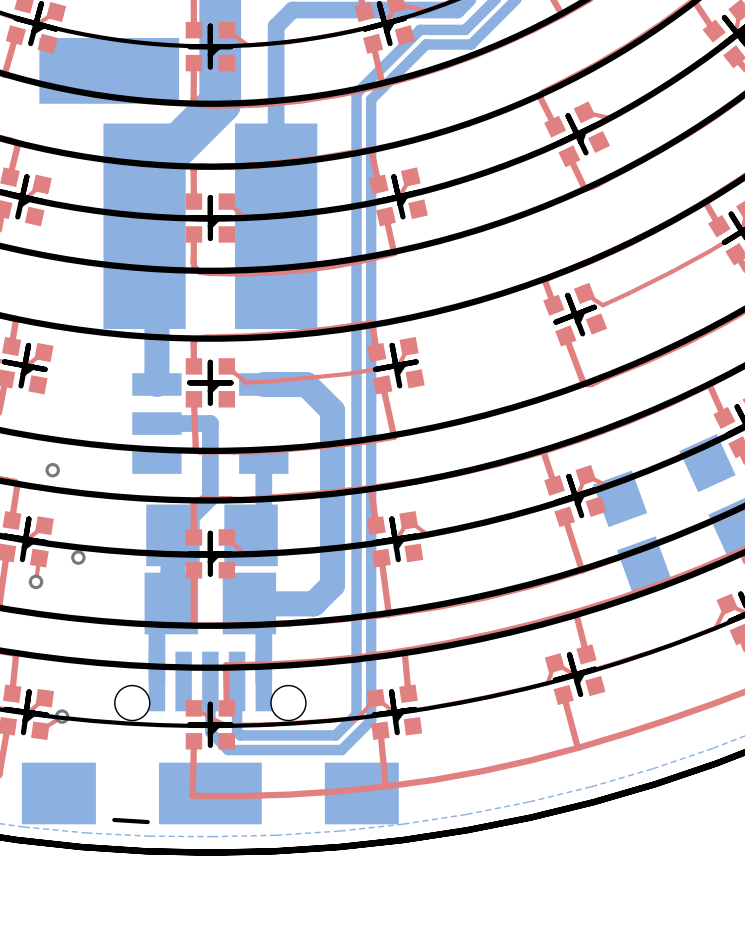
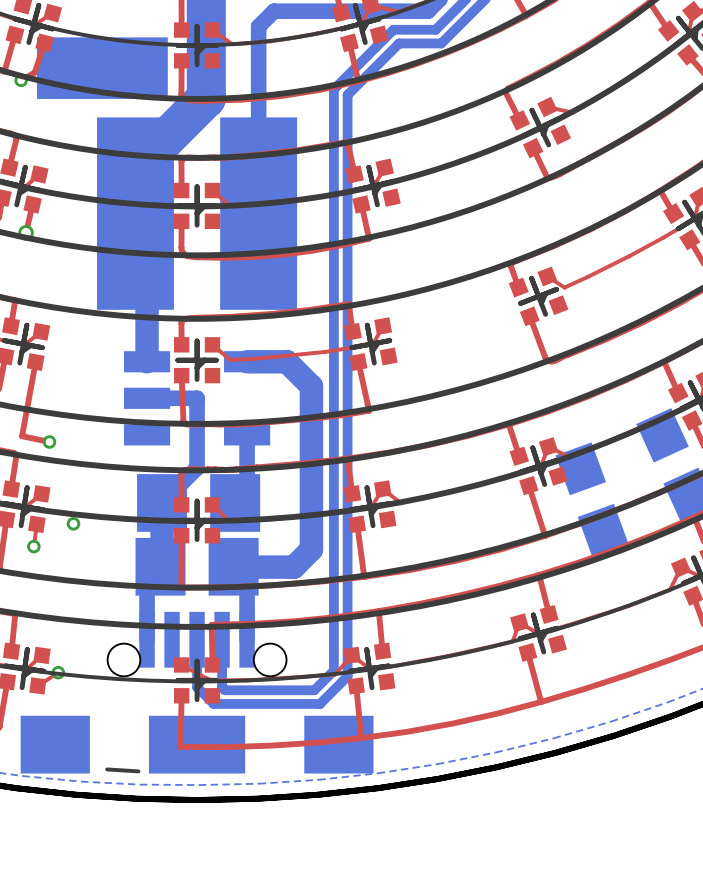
top track: none -> (44, 42) (34, 72) (21, 80)
via: none -> (21, 80)
top track: none -> (32, 204) (26, 232)
via: none -> (26, 232)
top track: none -> (35, 362) (22, 436) (49, 442)

